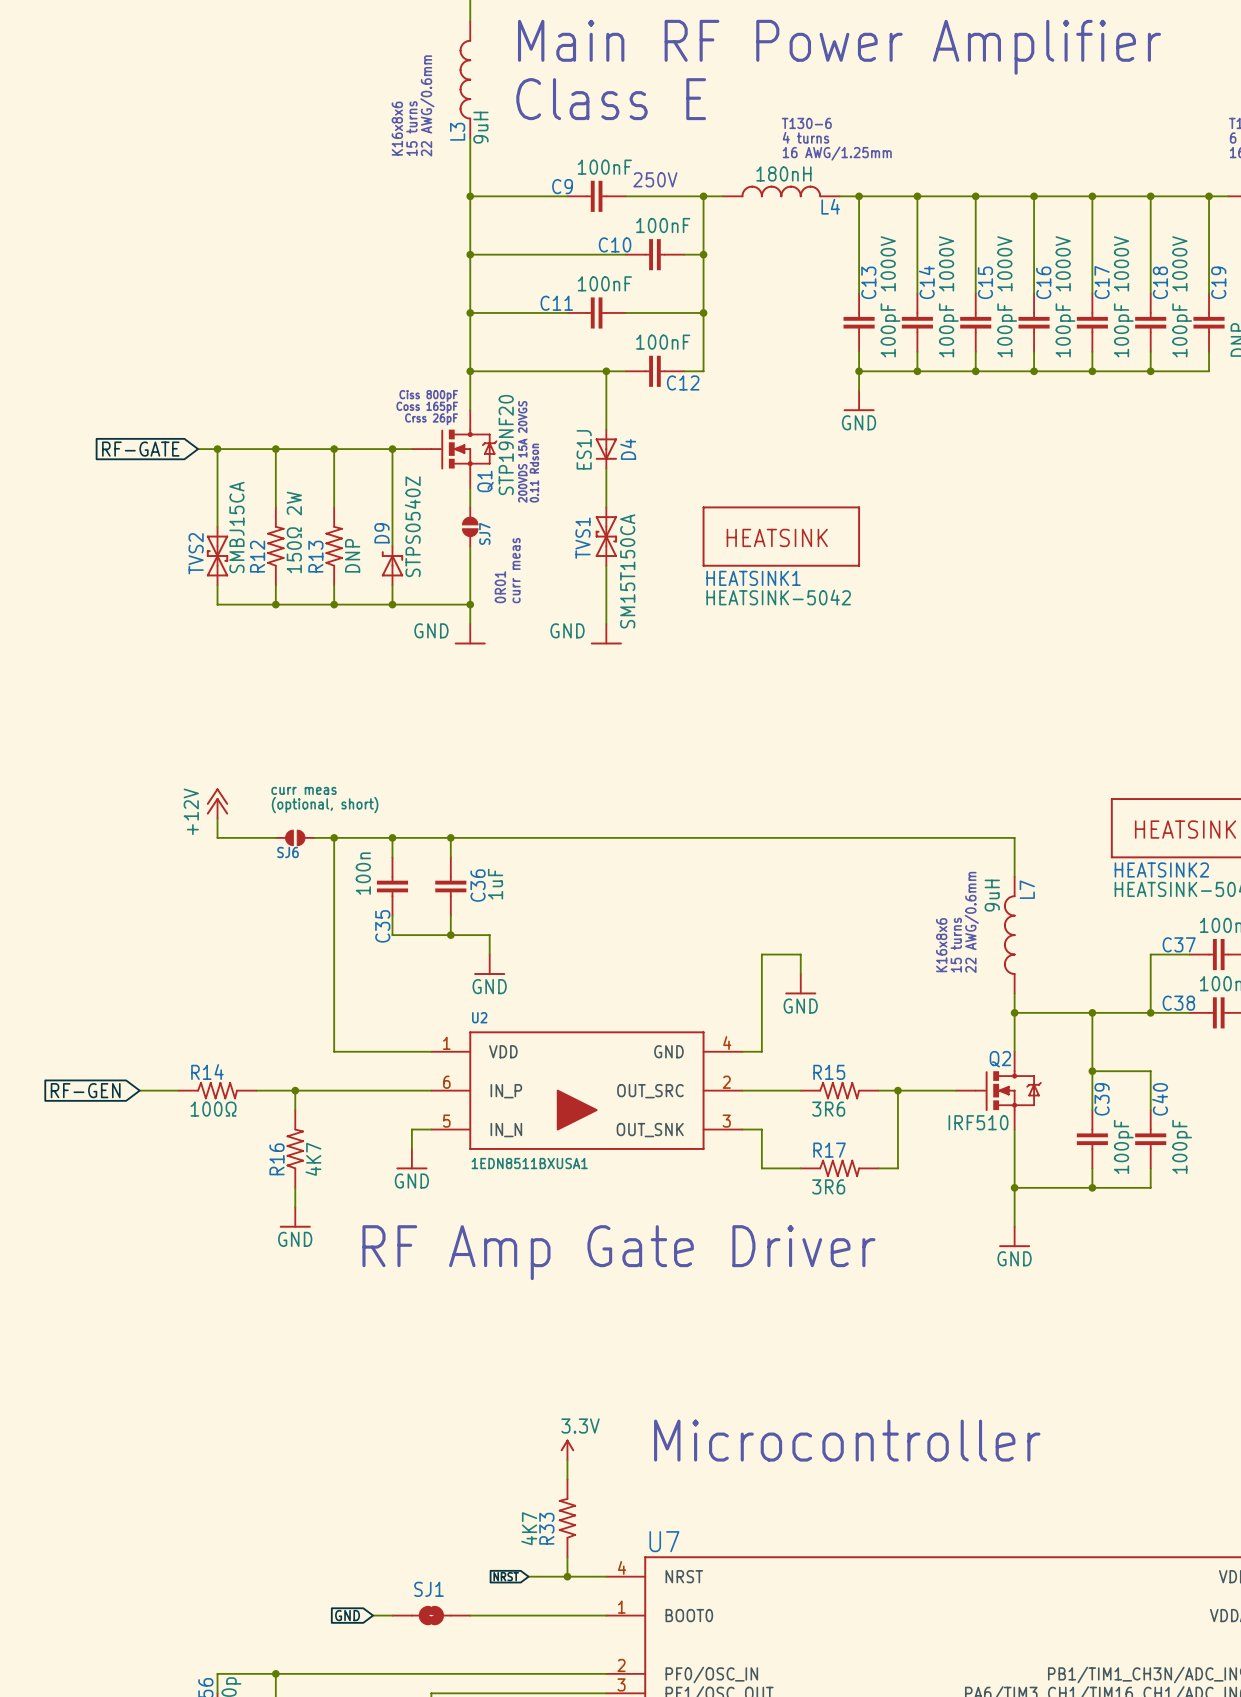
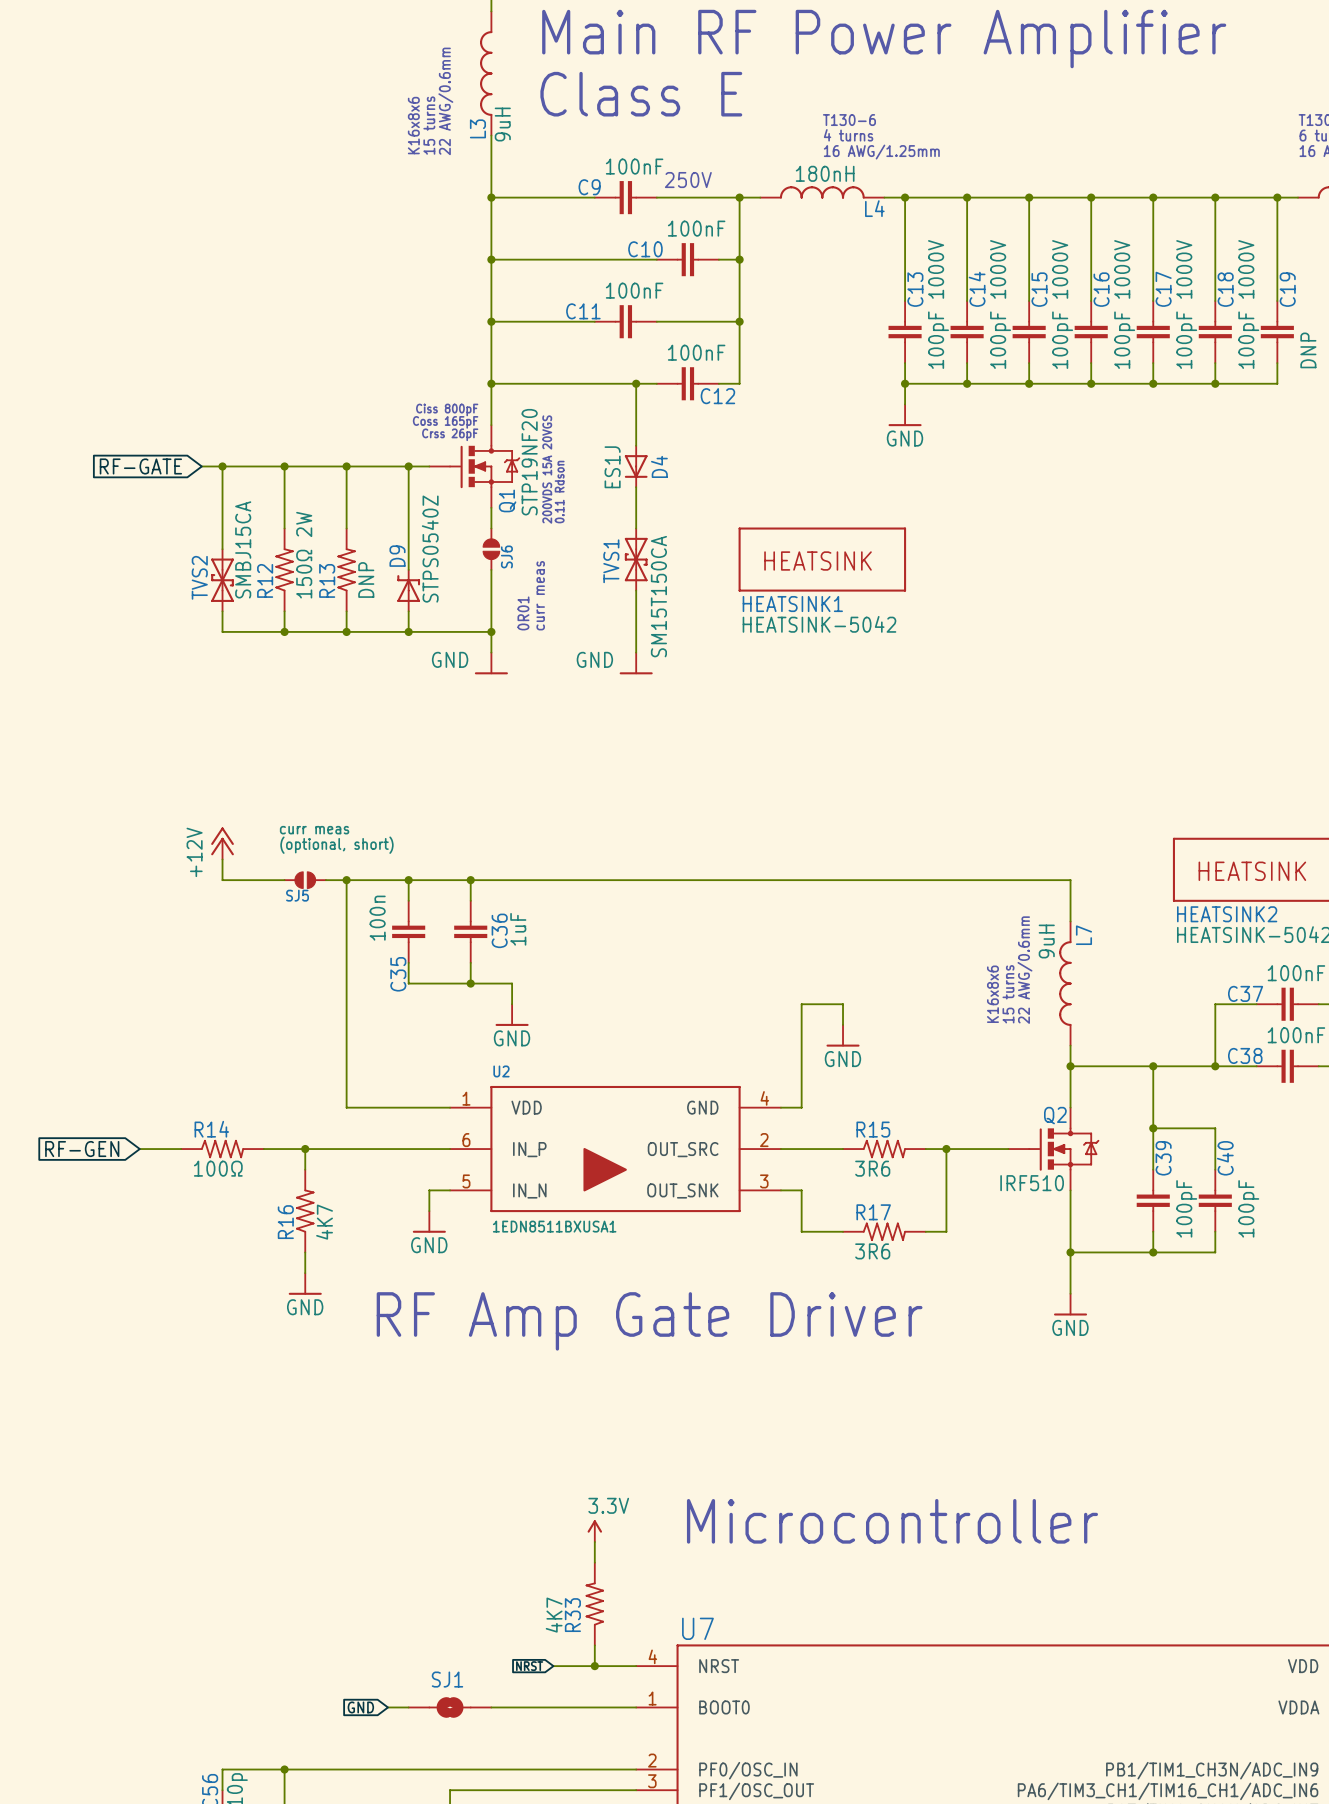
SJ7 name: SJ7 (484, 533) -> SJ6 (506, 556)
SJ6 name: SJ6 (288, 852) -> SJ5 (297, 895)

